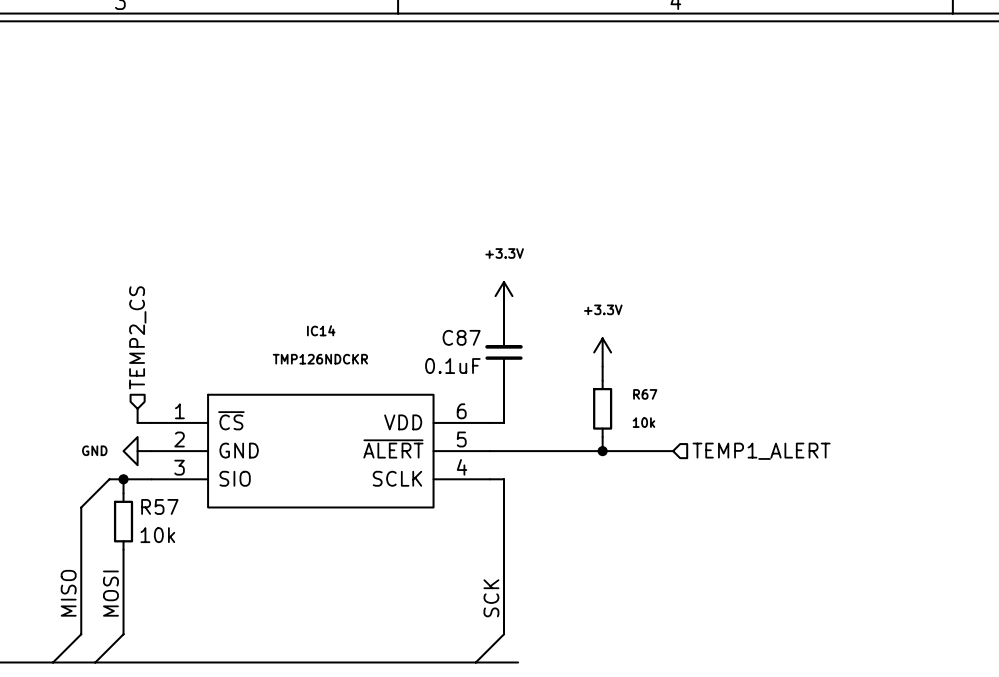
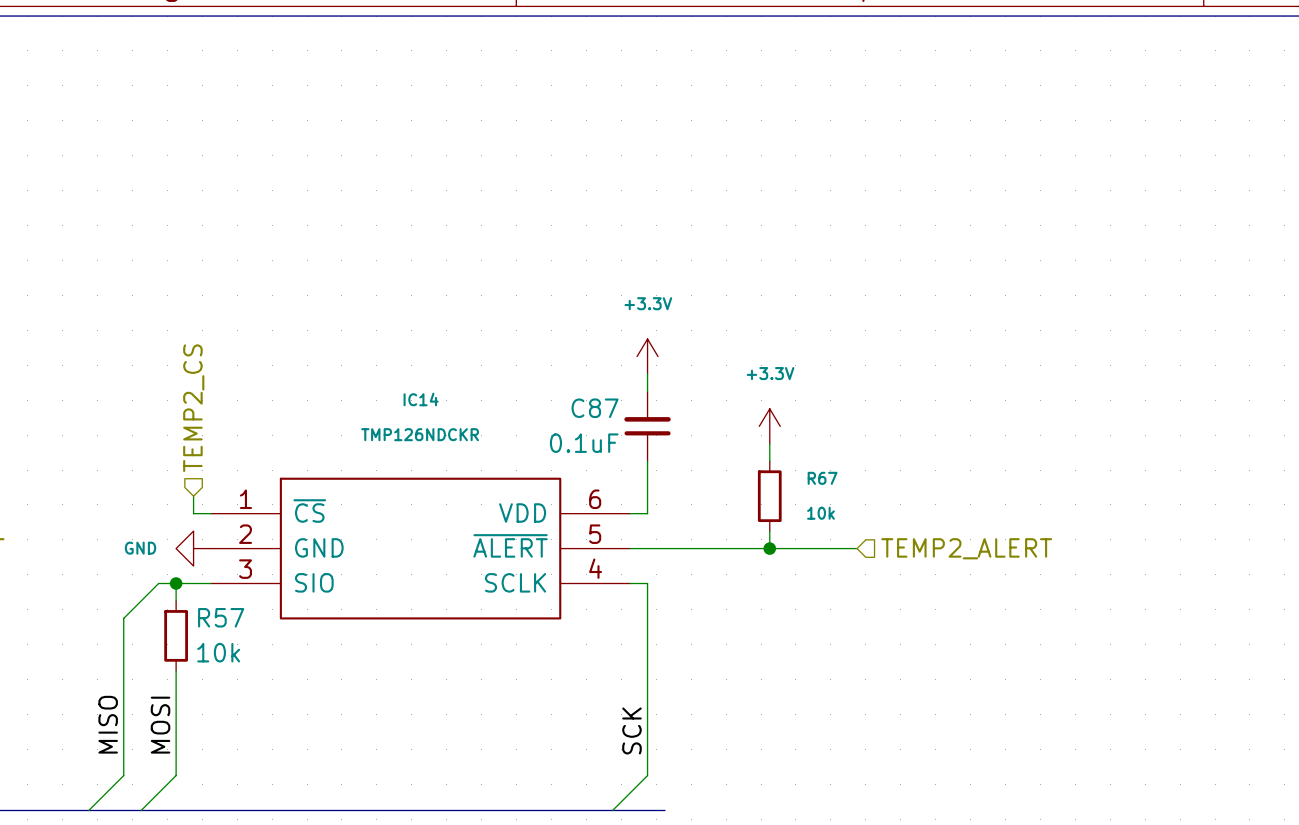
hierarchical label: TEMP1_ALERT (761, 451) -> TEMP2_ALERT (966, 548)

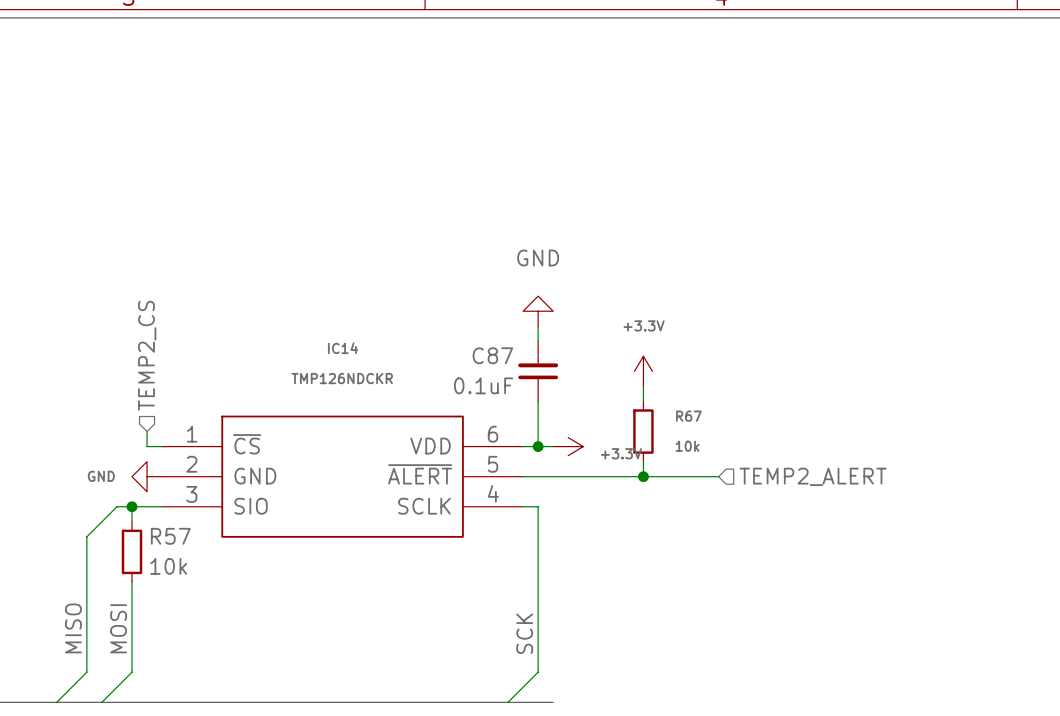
power symbol: +3.3V (647, 356) -> GND (538, 311)
wire: none -> (538, 446) (553, 446)
junction: none -> (538, 446)
power symbol: none -> +3.3V (568, 446)

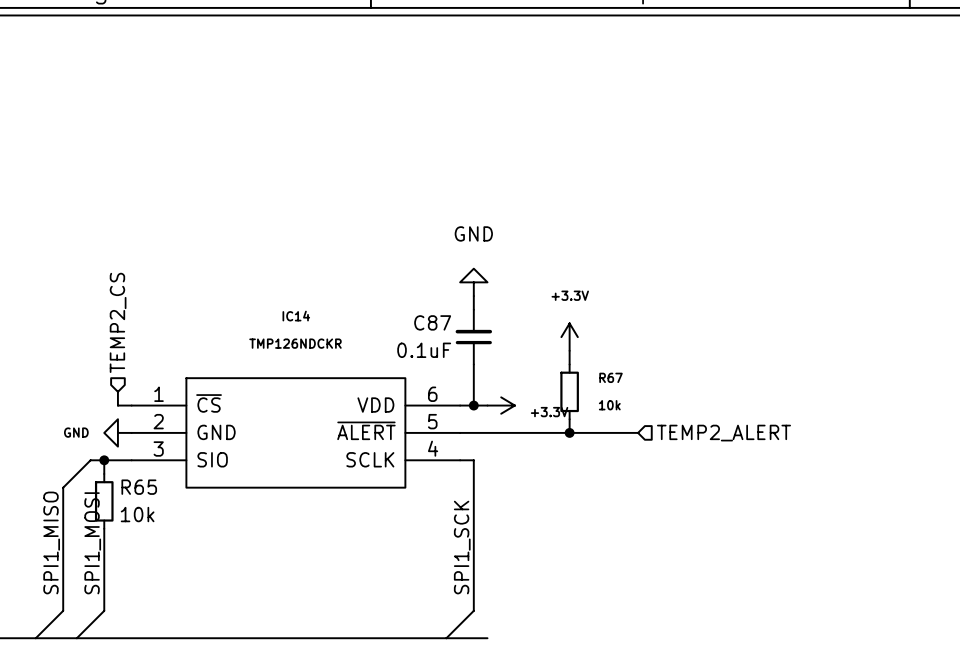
R57 name: R57 (170, 536) -> R65 (139, 487)
label: MISO (73, 628) -> SPI1_MISO (51, 542)
label: MOSI (118, 628) -> SPI1_MOSI (92, 543)
label: SCK (524, 633) -> SPI1_SCK (462, 547)

